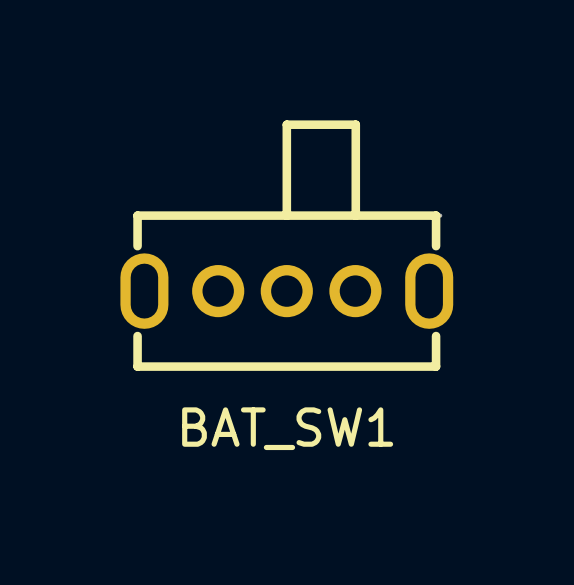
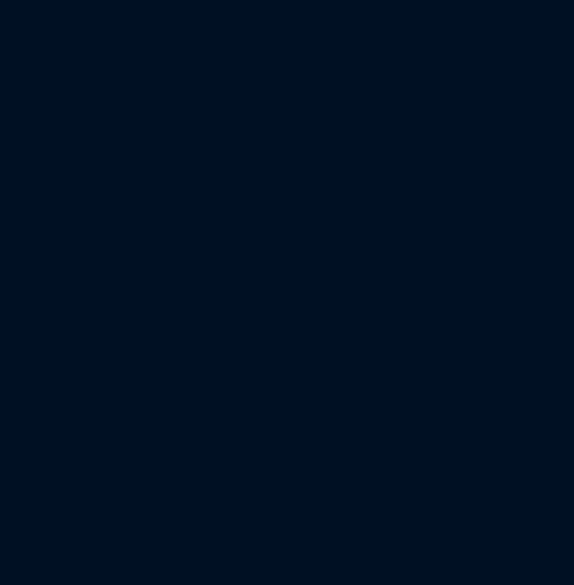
BAT_SW1: (286, 245) -> none

